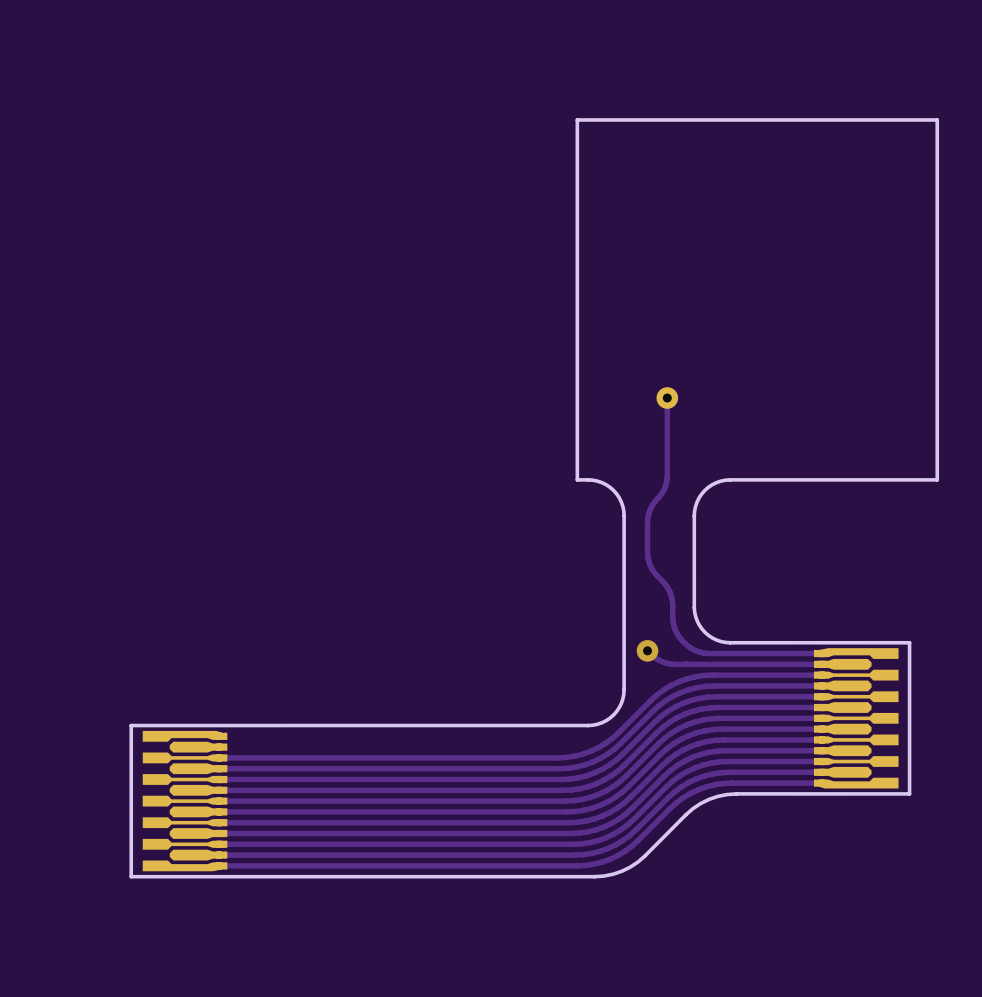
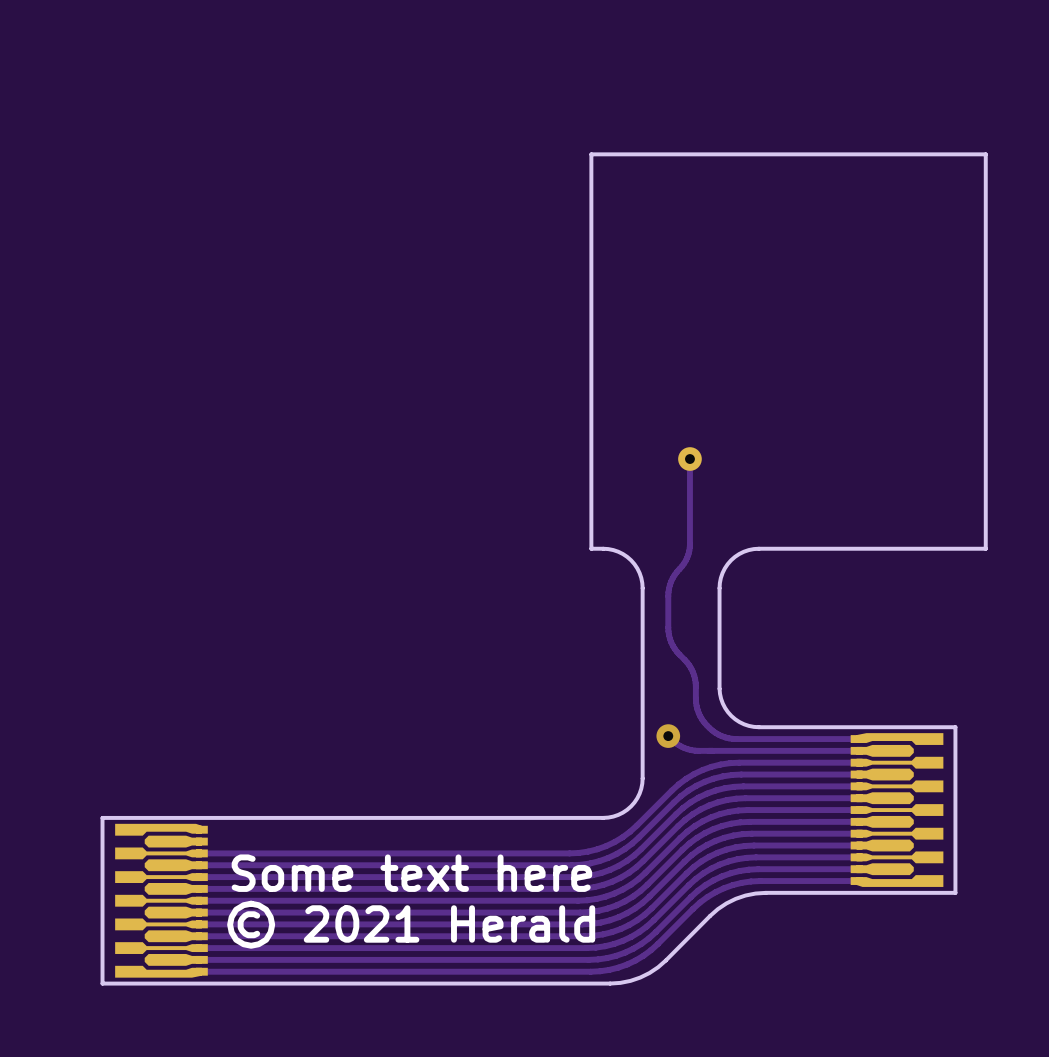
text: none -> Some text here (411, 873)
text: none -> © 2021 Herald (411, 924)

